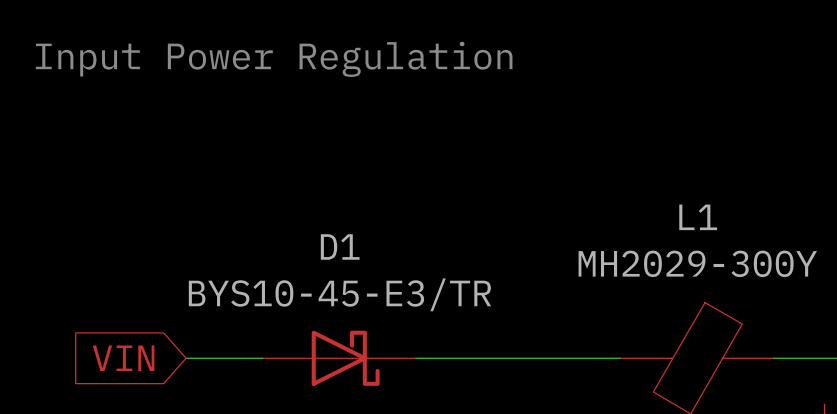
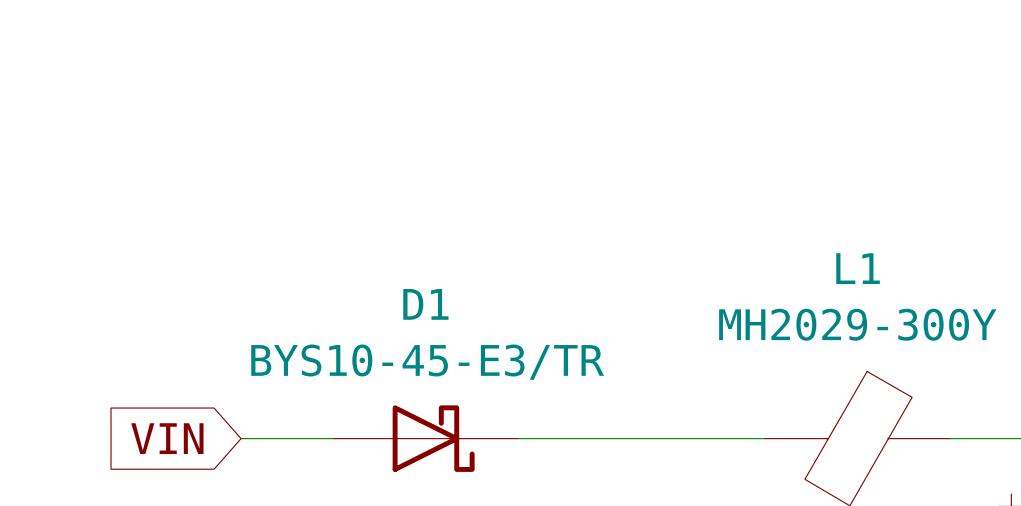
text: Input Power Regulation (274, 59) -> none

